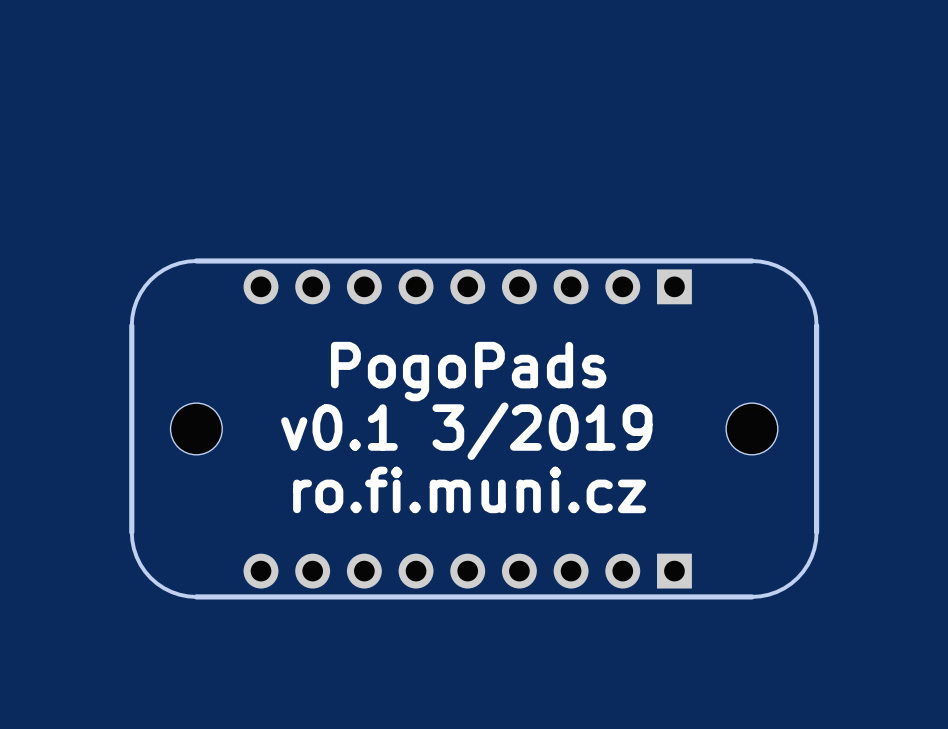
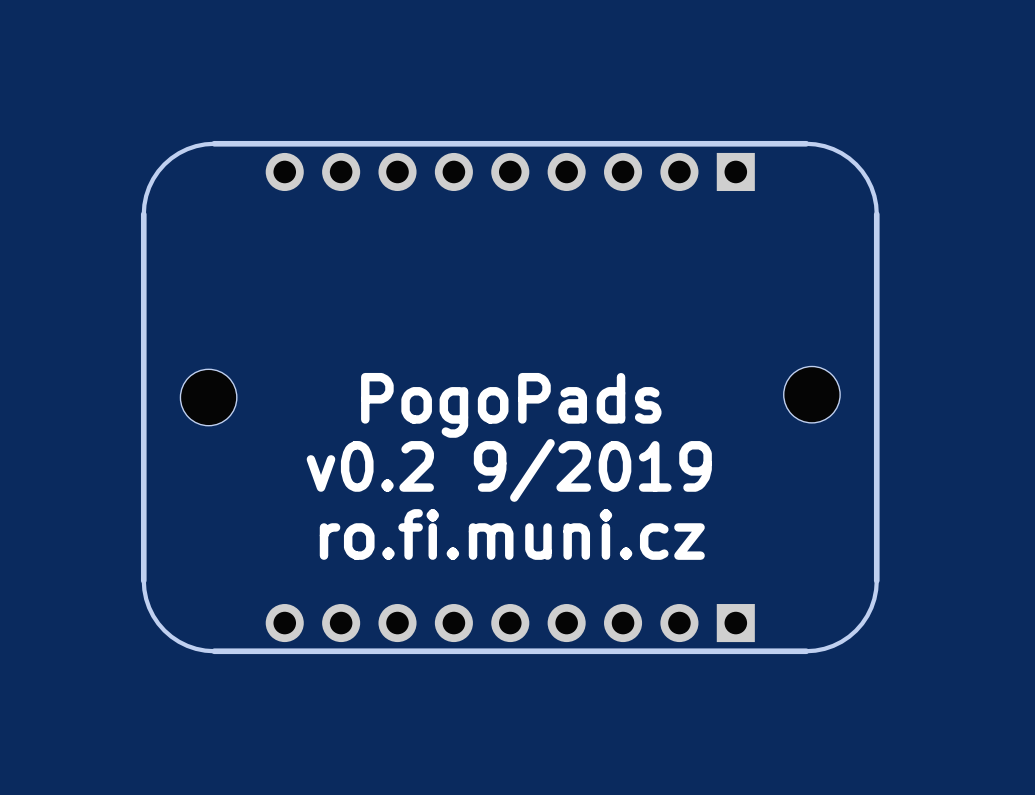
part position: (467, 286) -> (510, 171)
board edge: (131, 325) (136, 300) (150, 279) (171, 265) (187, 261) (751, 261) (776, 265) (791, 274) (803, 286) (811, 300) (816, 317) (816, 540) (807, 564) (791, 583) (768, 594) (739, 596) -> (143, 355) (143, 214) (146, 196) (153, 179) (164, 164) (179, 153) (196, 146) (214, 143) (806, 143) (833, 149) (849, 158) (862, 171) (871, 187) (876, 205) (876, 580) (871, 607) (856, 630) (833, 645) (806, 651)
part position: (196, 428) -> (208, 397)
part position: (751, 428) -> (811, 394)
text: v0.1 3/2019 (466, 431) -> v0.2 9/2019 (509, 470)

